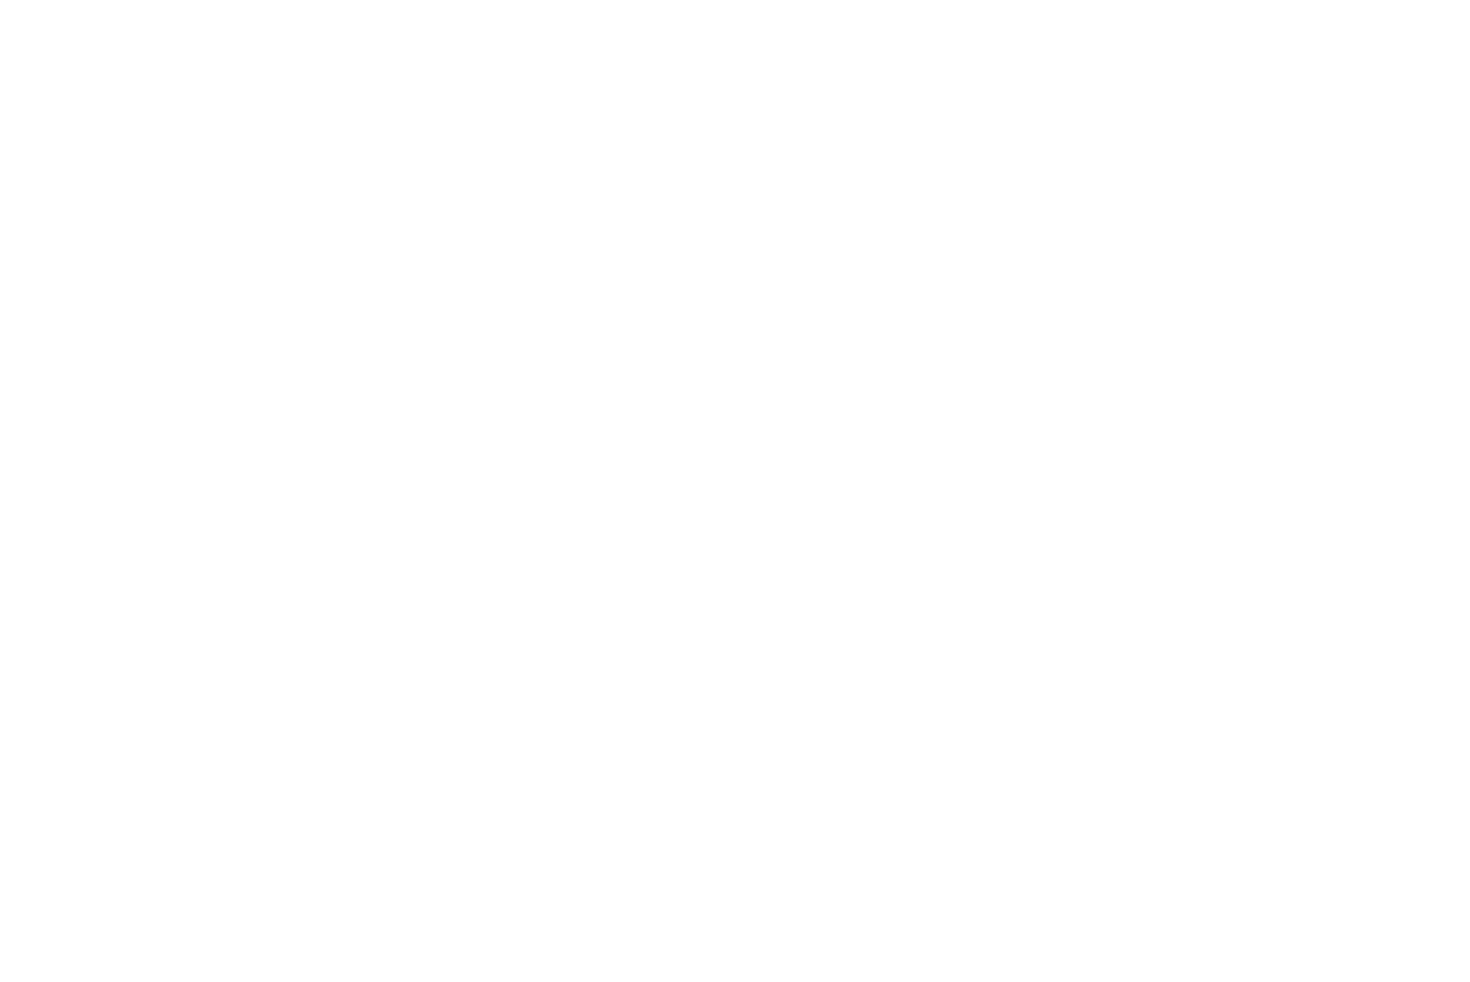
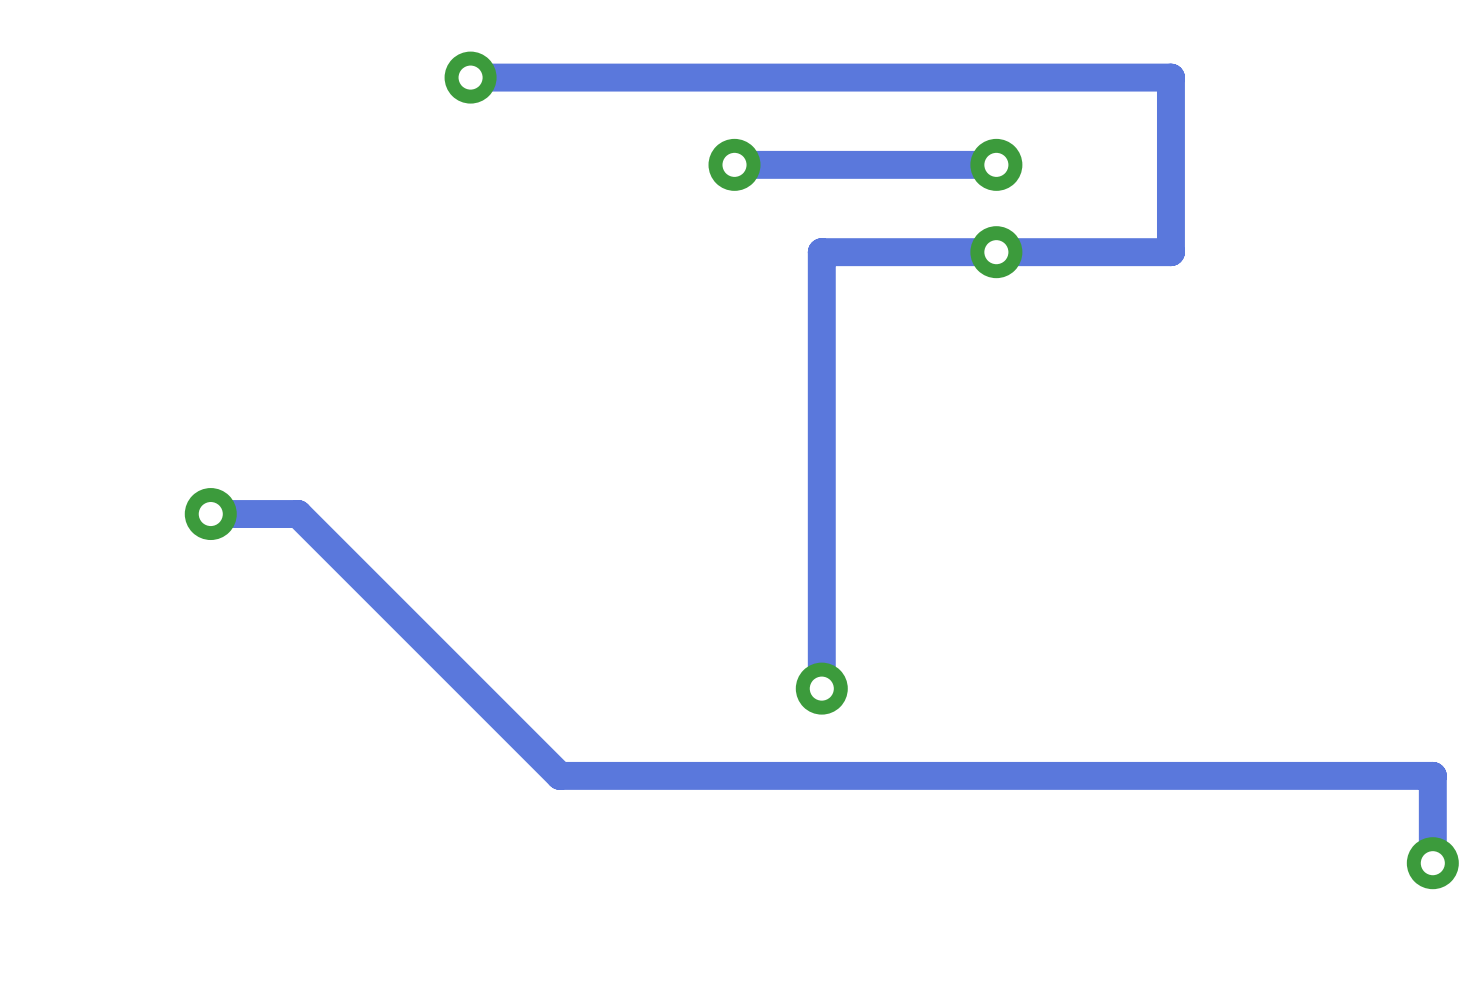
track: none -> (470, 77) (1170, 77) (1170, 252) (821, 252) (821, 688)
via: none -> (470, 77)
via: none -> (734, 164)
track: none -> (996, 164) (734, 164)
via: none -> (996, 164)
via: none -> (996, 252)
track: none -> (210, 514) (298, 514) (559, 775) (1432, 775) (1432, 863)
via: none -> (210, 514)
via: none -> (821, 688)
via: none -> (1432, 863)

